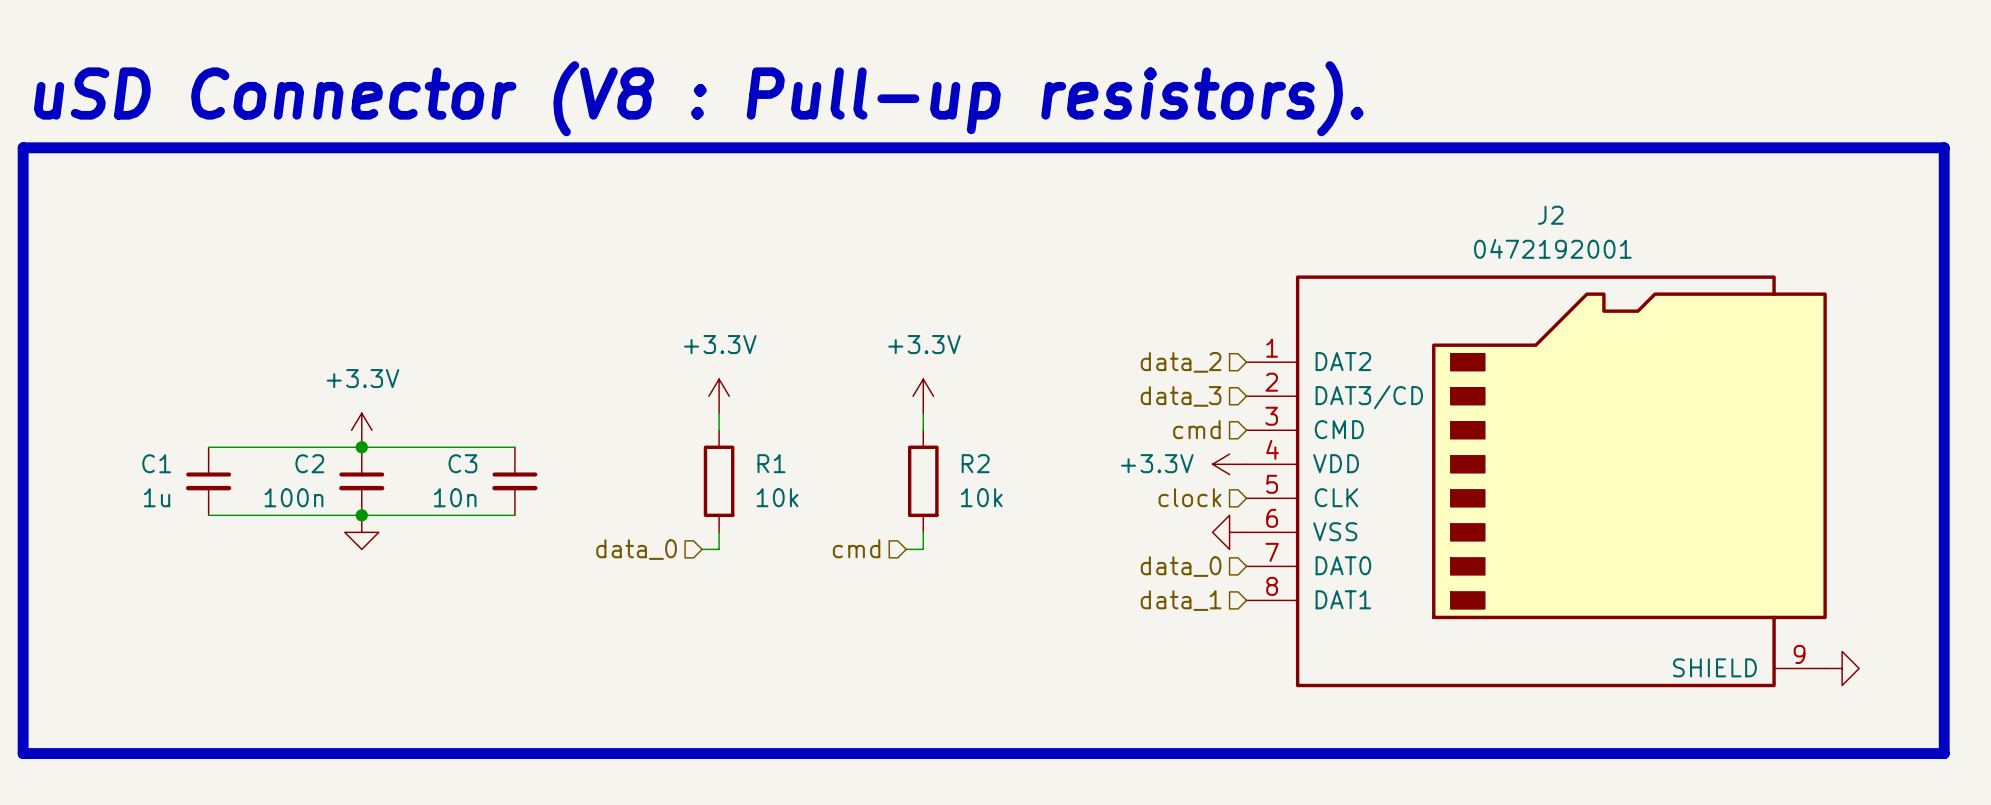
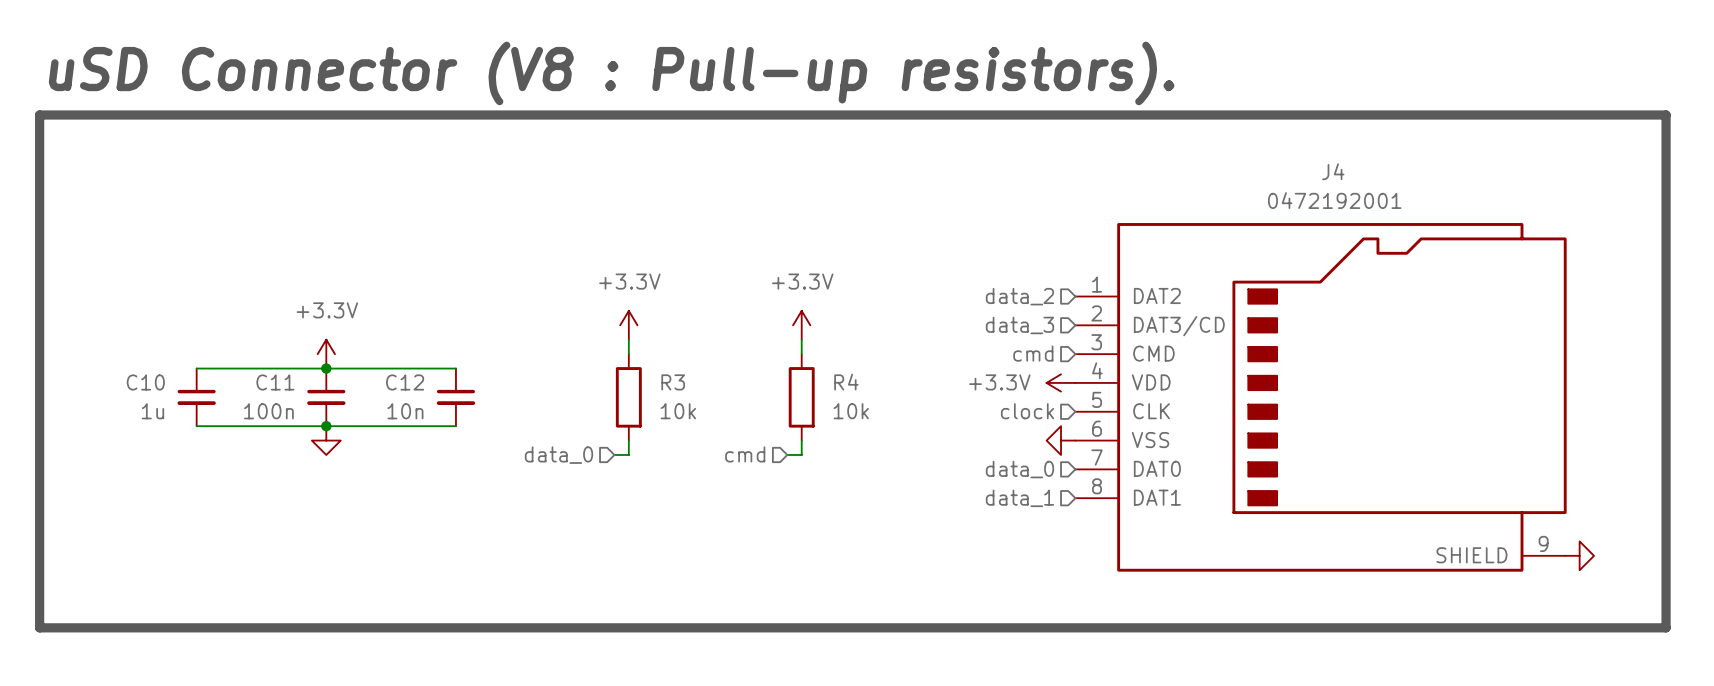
J2 name: J2 (1550, 215) -> J4 (1333, 171)
C1 name: C1 (156, 463) -> C10 (145, 382)
C2 name: C2 (309, 463) -> C11 (275, 382)
C3 name: C3 (462, 463) -> C12 (405, 382)
R1 name: R1 (771, 463) -> R3 (673, 382)
R2 name: R2 (975, 463) -> R4 (846, 382)

